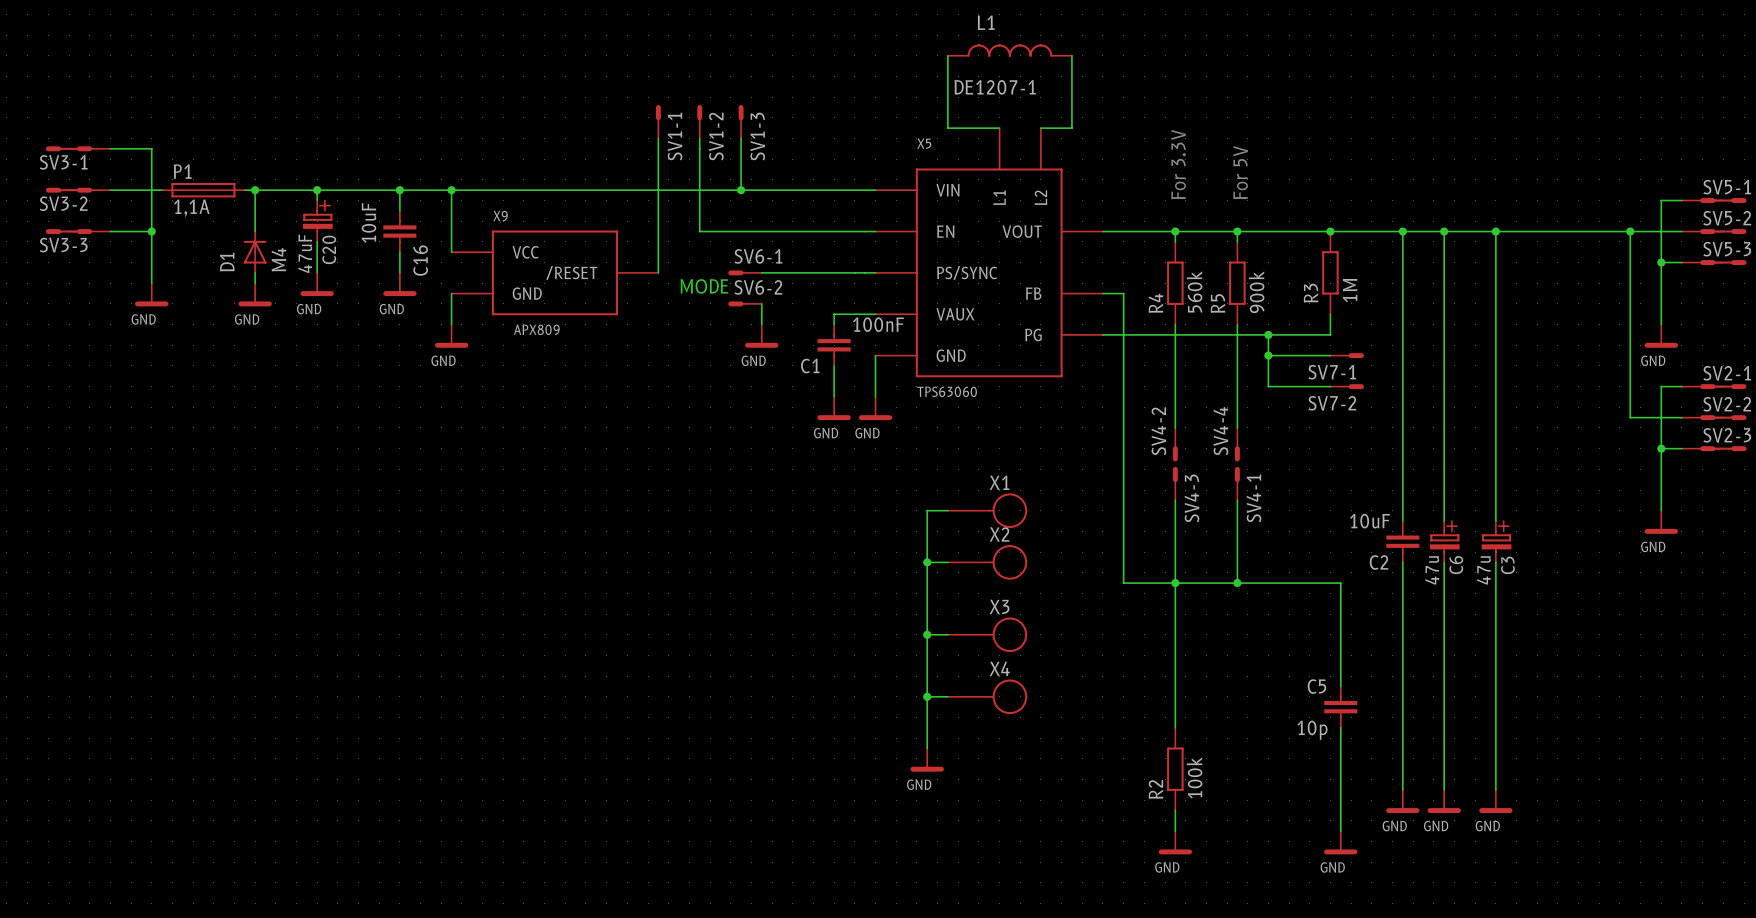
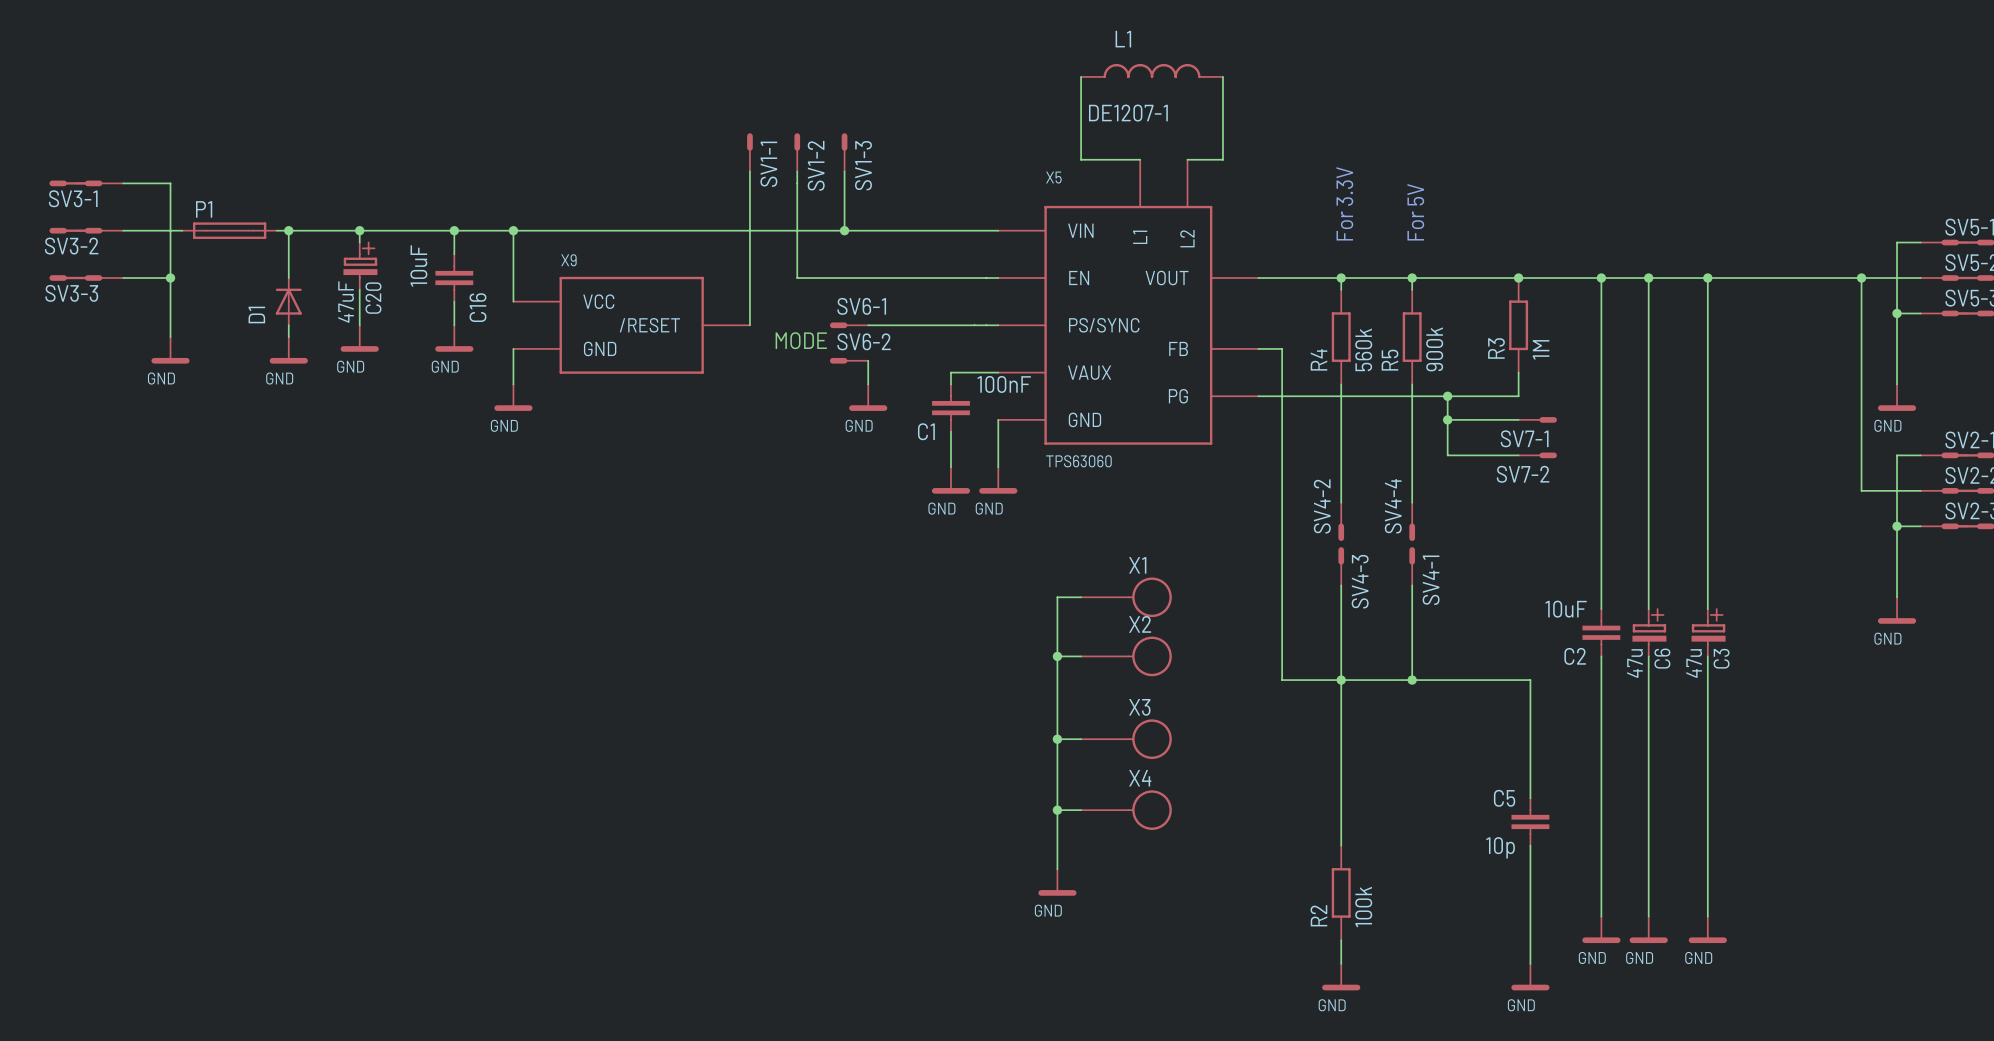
P1 value: 1,1A (191, 208) -> none
D1 value: M4 (278, 259) -> none
X9 value: APX809 (536, 329) -> none

